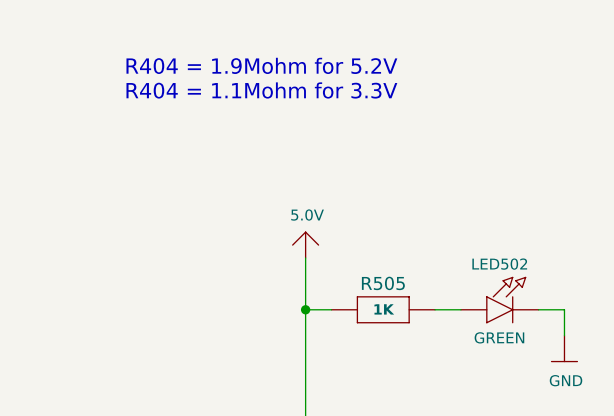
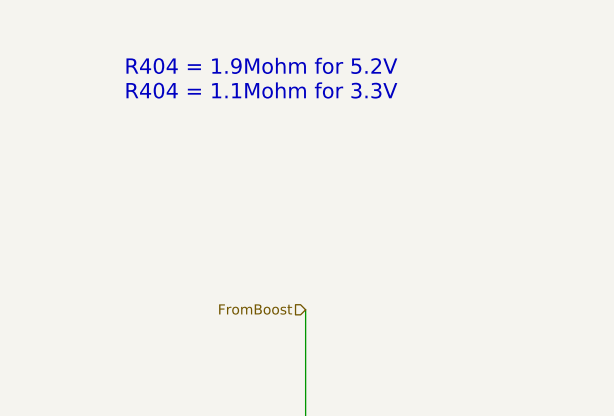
power symbol: 5.0V (305, 245) -> none
wire: (305, 258) (305, 309) (331, 309) -> none
LED502: GREEN (499, 300) -> none
hierarchical label: none -> FromBoost (255, 309)
junction: (305, 309) -> none
R505: 1K (383, 309) -> none
wire: (435, 309) (460, 309) -> none
wire: (538, 309) (564, 309) (564, 335) -> none
power symbol: GND (564, 348) -> none

